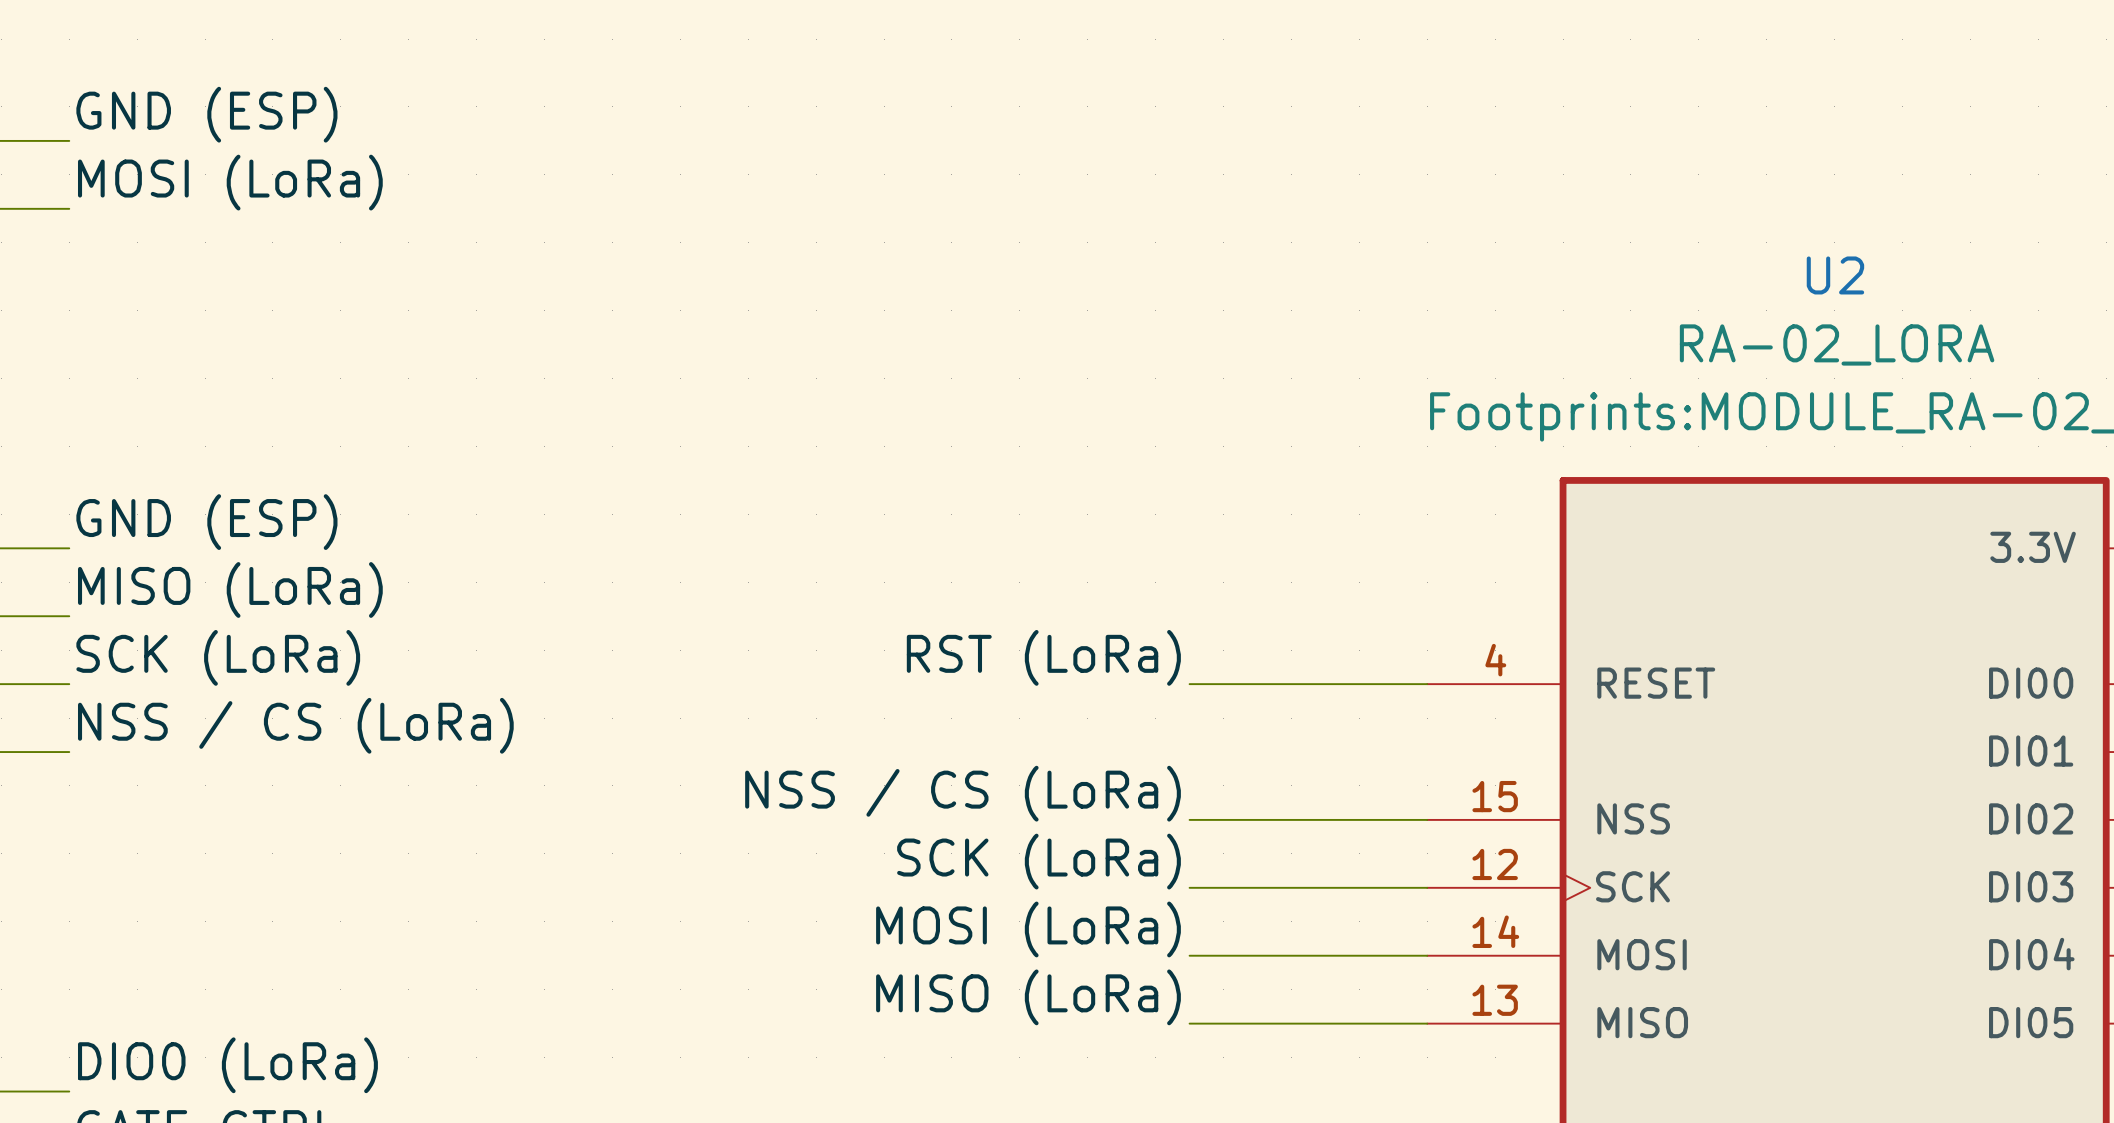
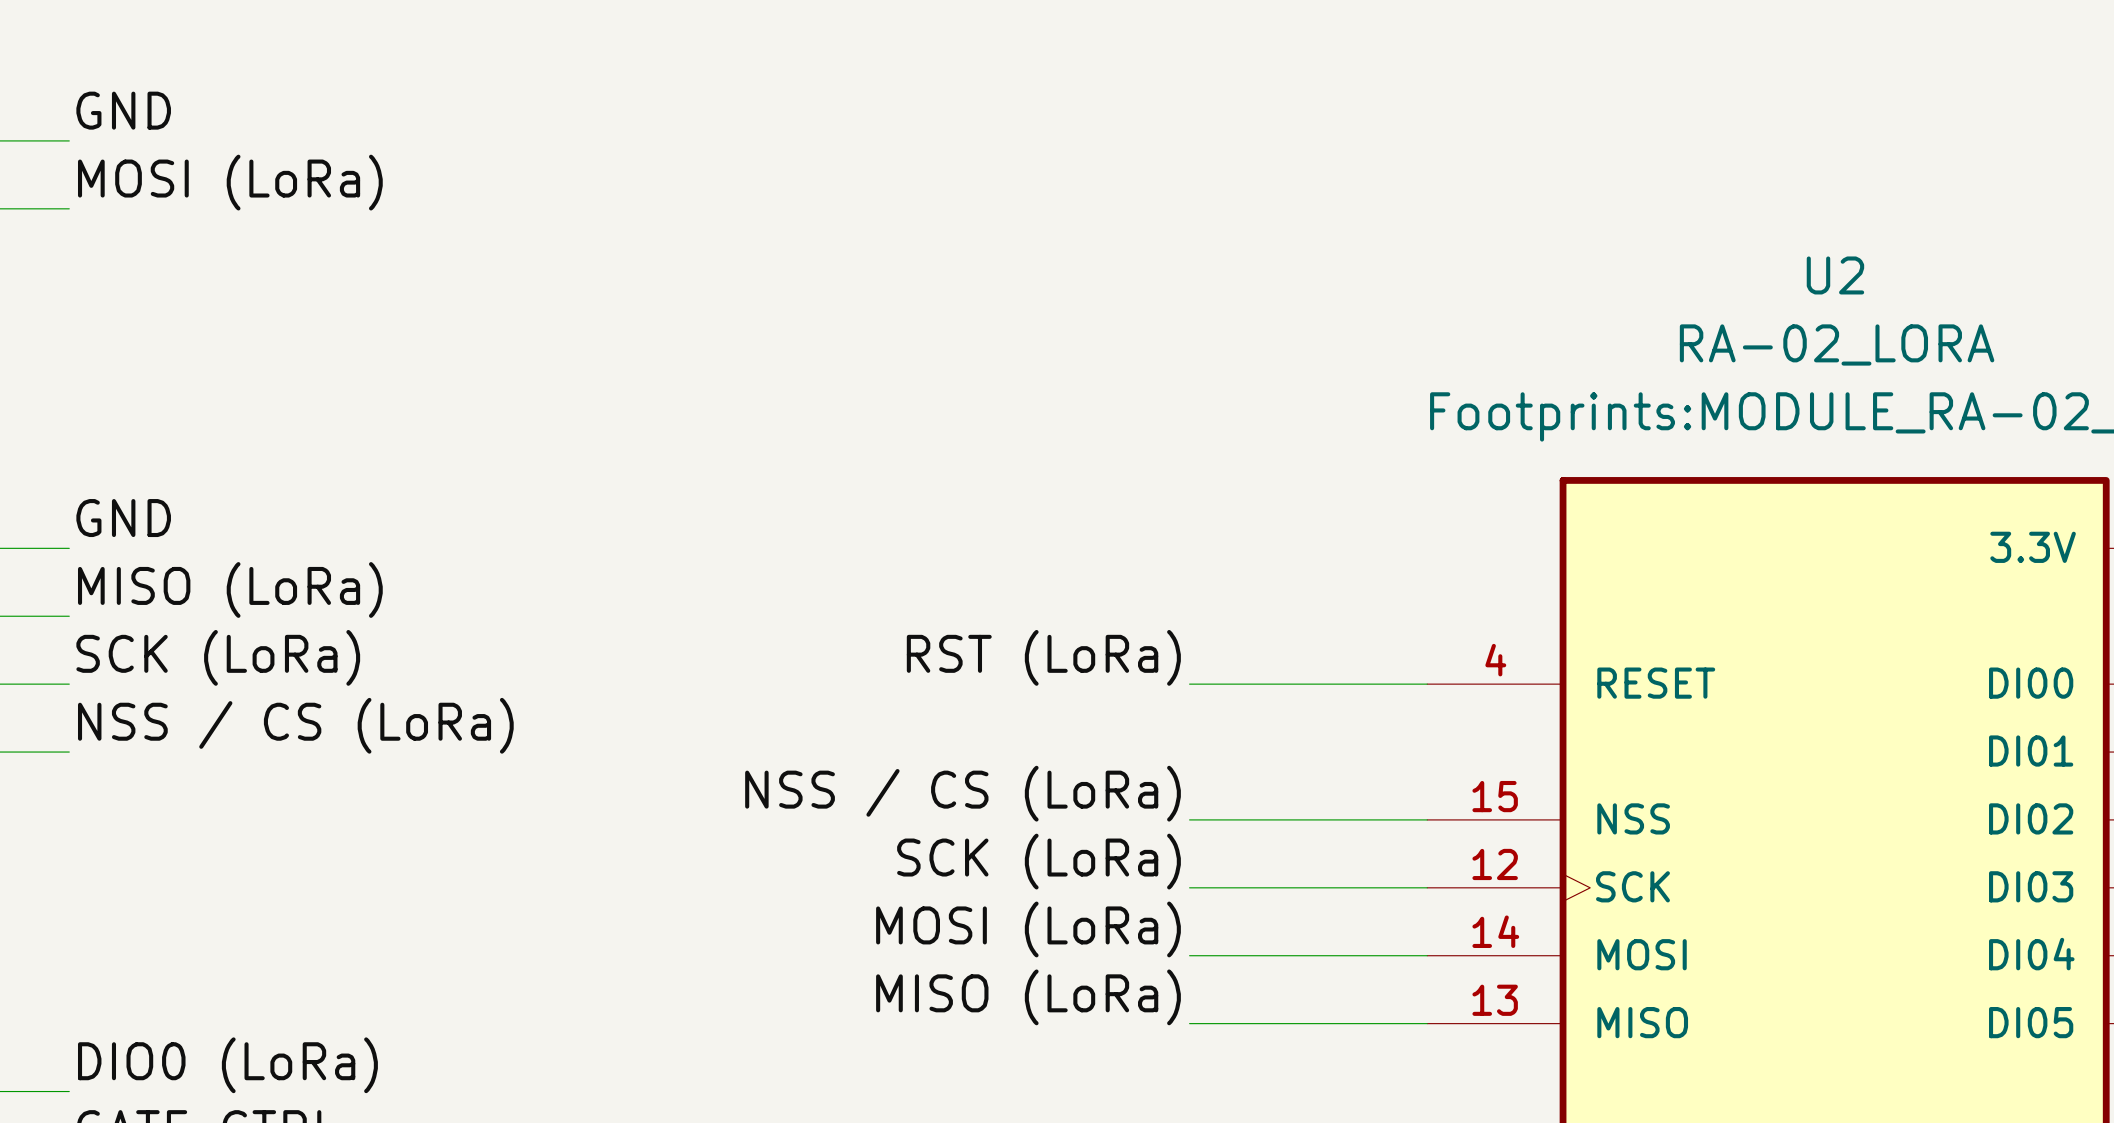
label: GND (ESP) (206, 114) -> GND (123, 110)
label: GND (ESP) (206, 522) -> GND (123, 518)

